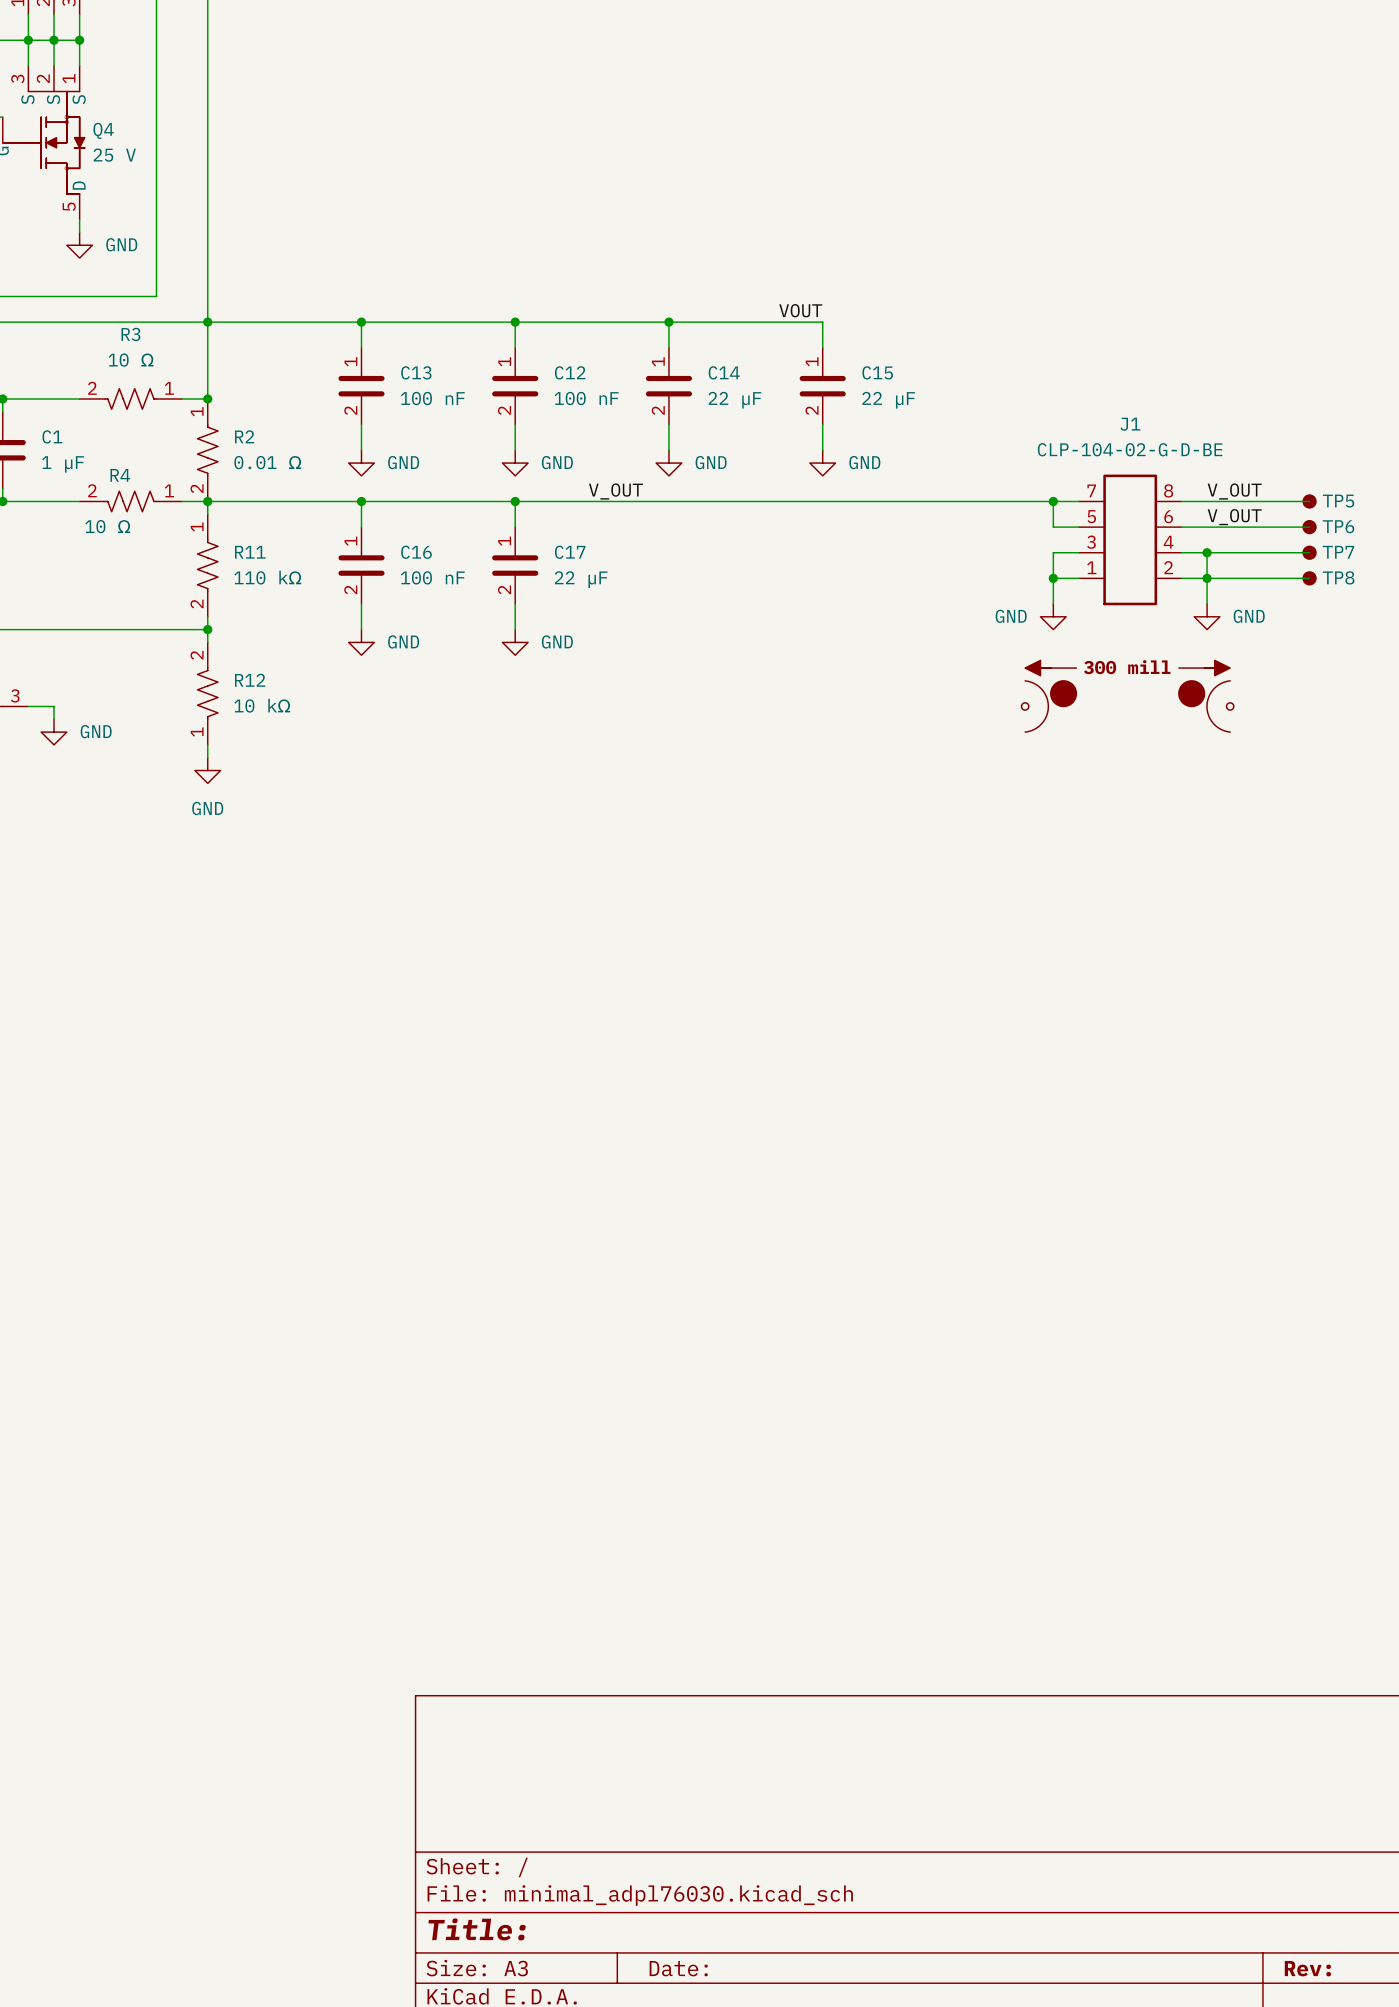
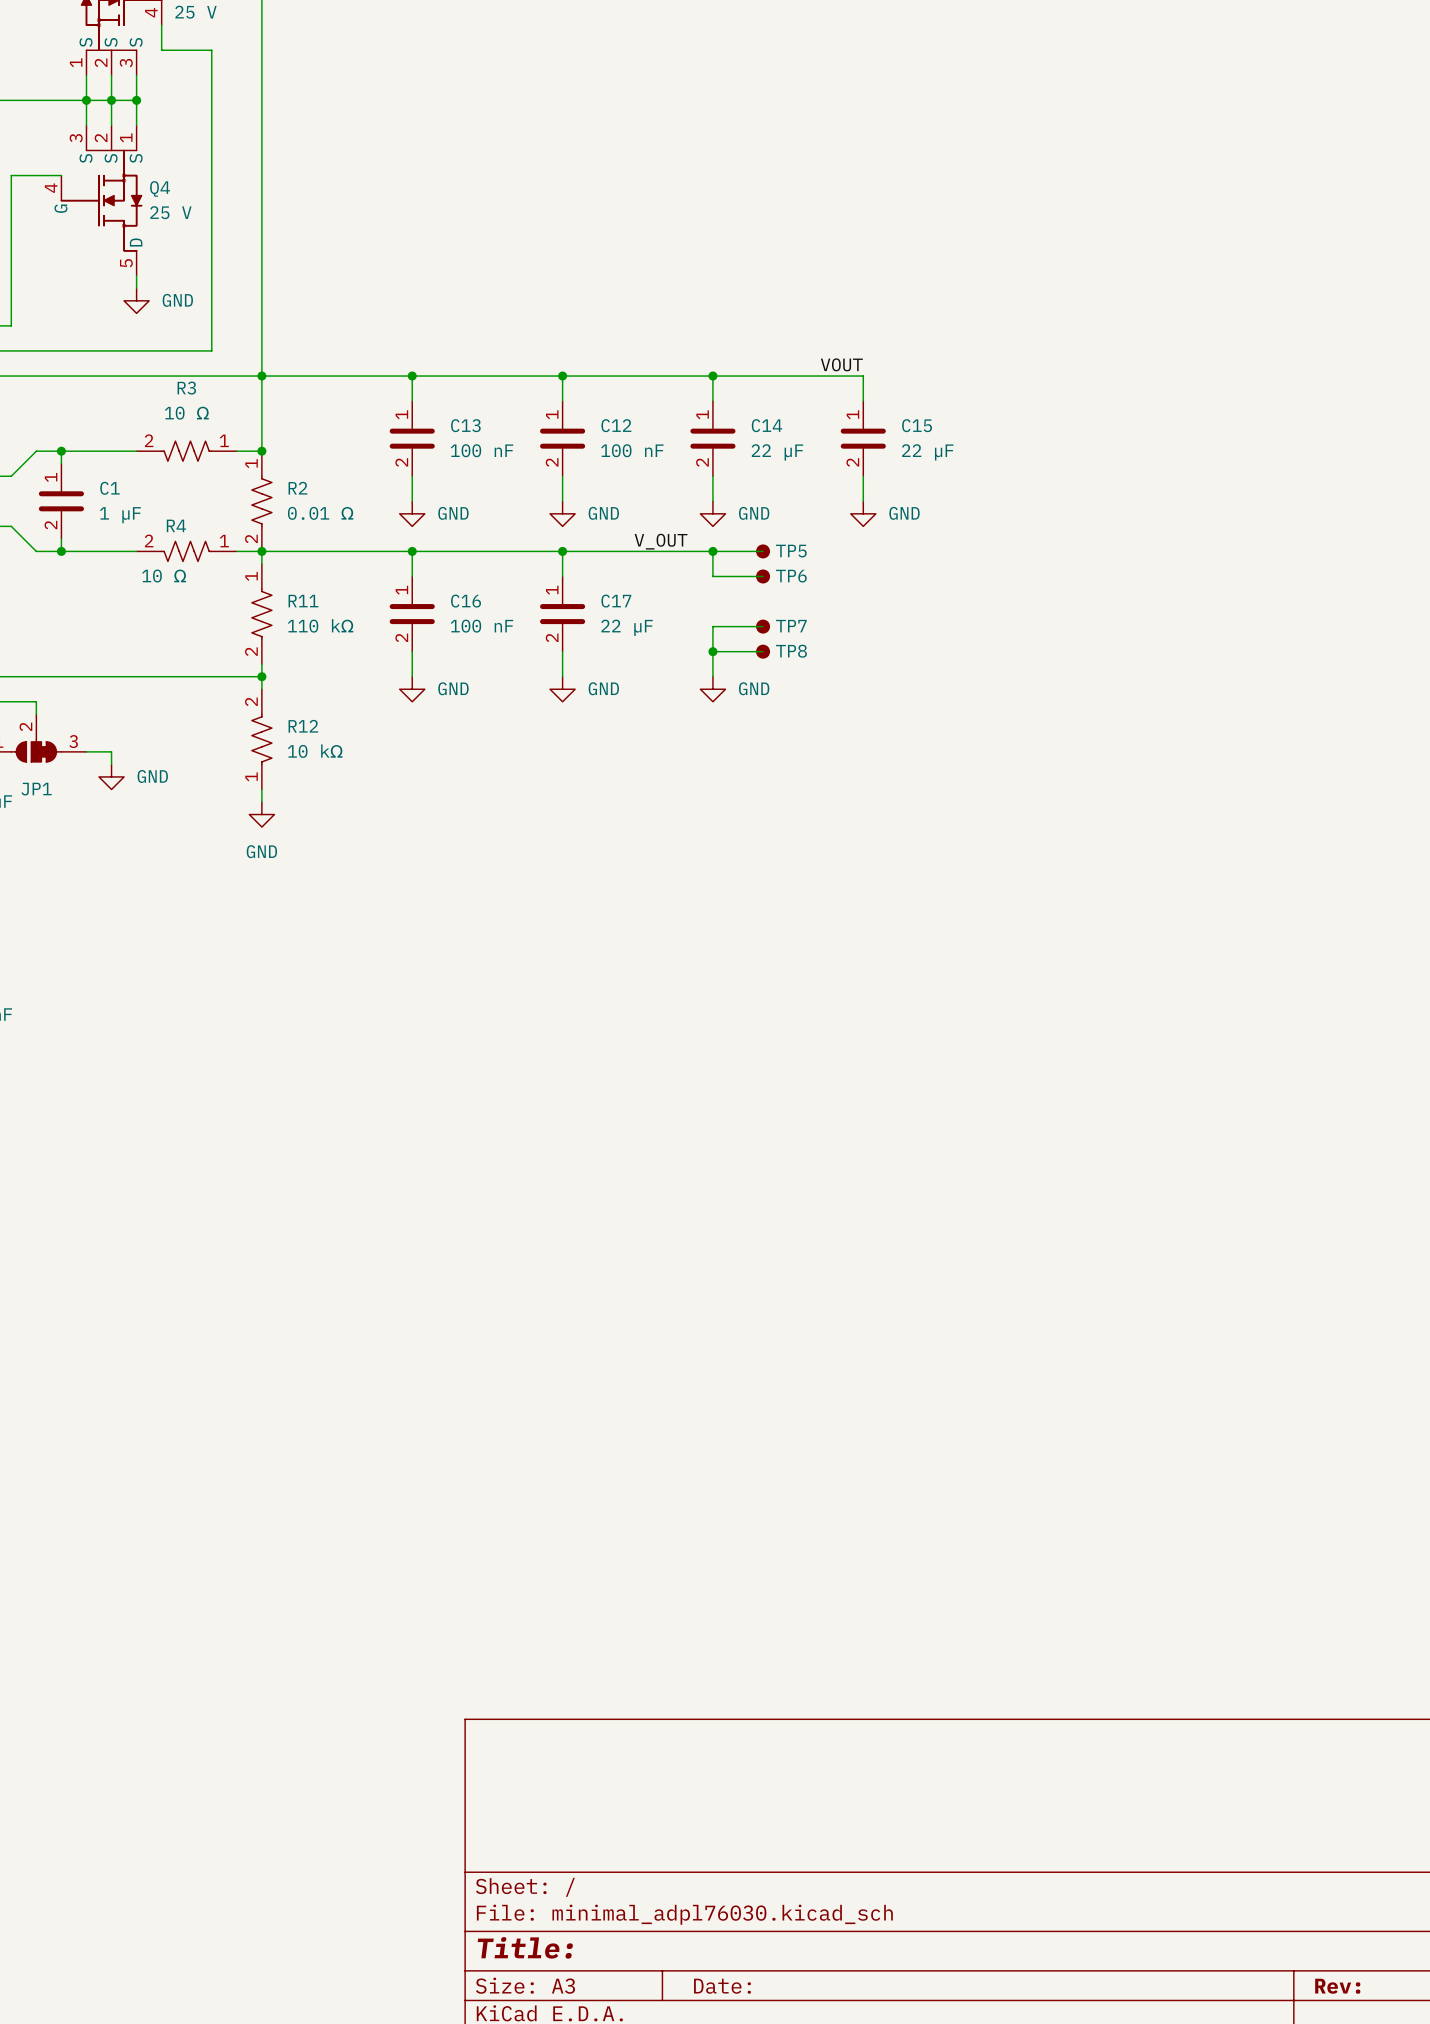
label: V_OUT (1234, 491) -> none
wire: none -> (712, 551) (712, 576) (763, 576)
junction: none -> (712, 551)
wire: (720, 501) (1078, 501) -> none
wire: (1053, 501) (1053, 527) (1078, 527) -> none
junction: (1053, 501) -> none
wire: (1181, 501) (1309, 501) -> none
TP5 position: (1309, 501) -> (763, 551)
label: V_OUT (1234, 517) -> none
wire: (1181, 527) (1309, 527) -> none
TP6 position: (1309, 527) -> (763, 576)
J1: CLP-104-02-G-D-BE (1130, 539) -> none
wire: (1078, 552) (1053, 552) (1053, 603) -> none
wire: (1181, 552) (1309, 552) -> none
wire: (1207, 552) (1207, 603) -> none
junction: (1207, 552) -> none
TP7 position: (1309, 552) -> (763, 626)
wire: none -> (763, 626) (712, 626) (712, 676)
wire: (1053, 578) (1078, 578) -> none
junction: (1053, 578) -> none
wire: (1181, 578) (1309, 578) -> none
junction: (1207, 578) -> none
TP8 position: (1309, 578) -> (763, 651)
wire: none -> (712, 651) (763, 651)
junction: none -> (712, 651)
power symbol: GND (1053, 616) -> none
power symbol: GND (1207, 616) -> none
power symbol: none -> GND (712, 689)
part: (1127, 696) -> none

